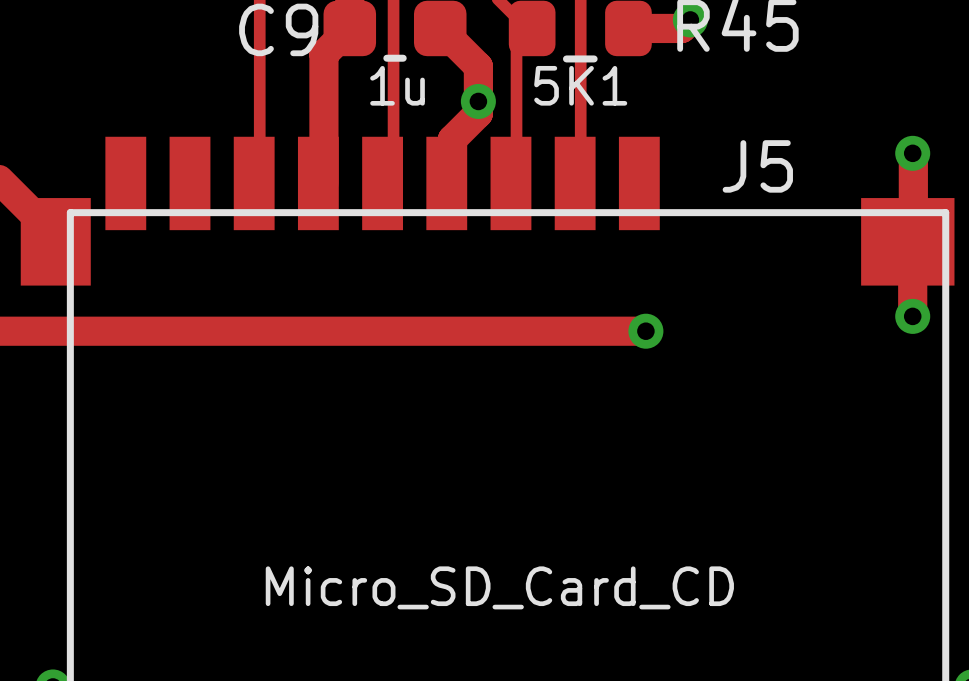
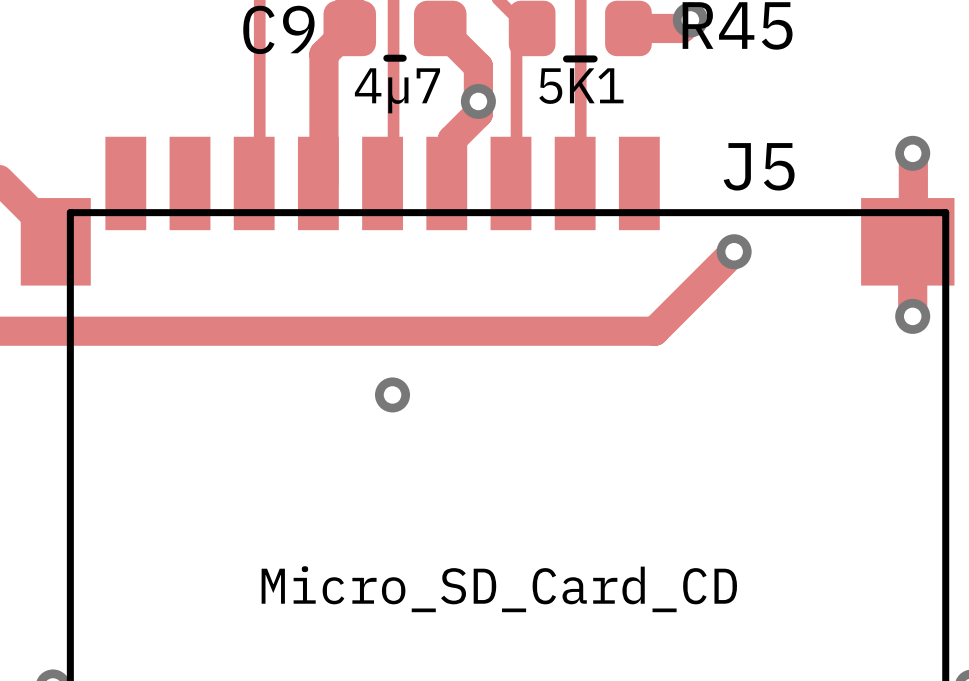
C9 value: 1u (397, 85) -> 4µ7 (397, 90)
track: none -> (734, 251) (654, 331) (645, 331)
via position: (645, 331) -> (734, 251)
via: none -> (392, 394)

